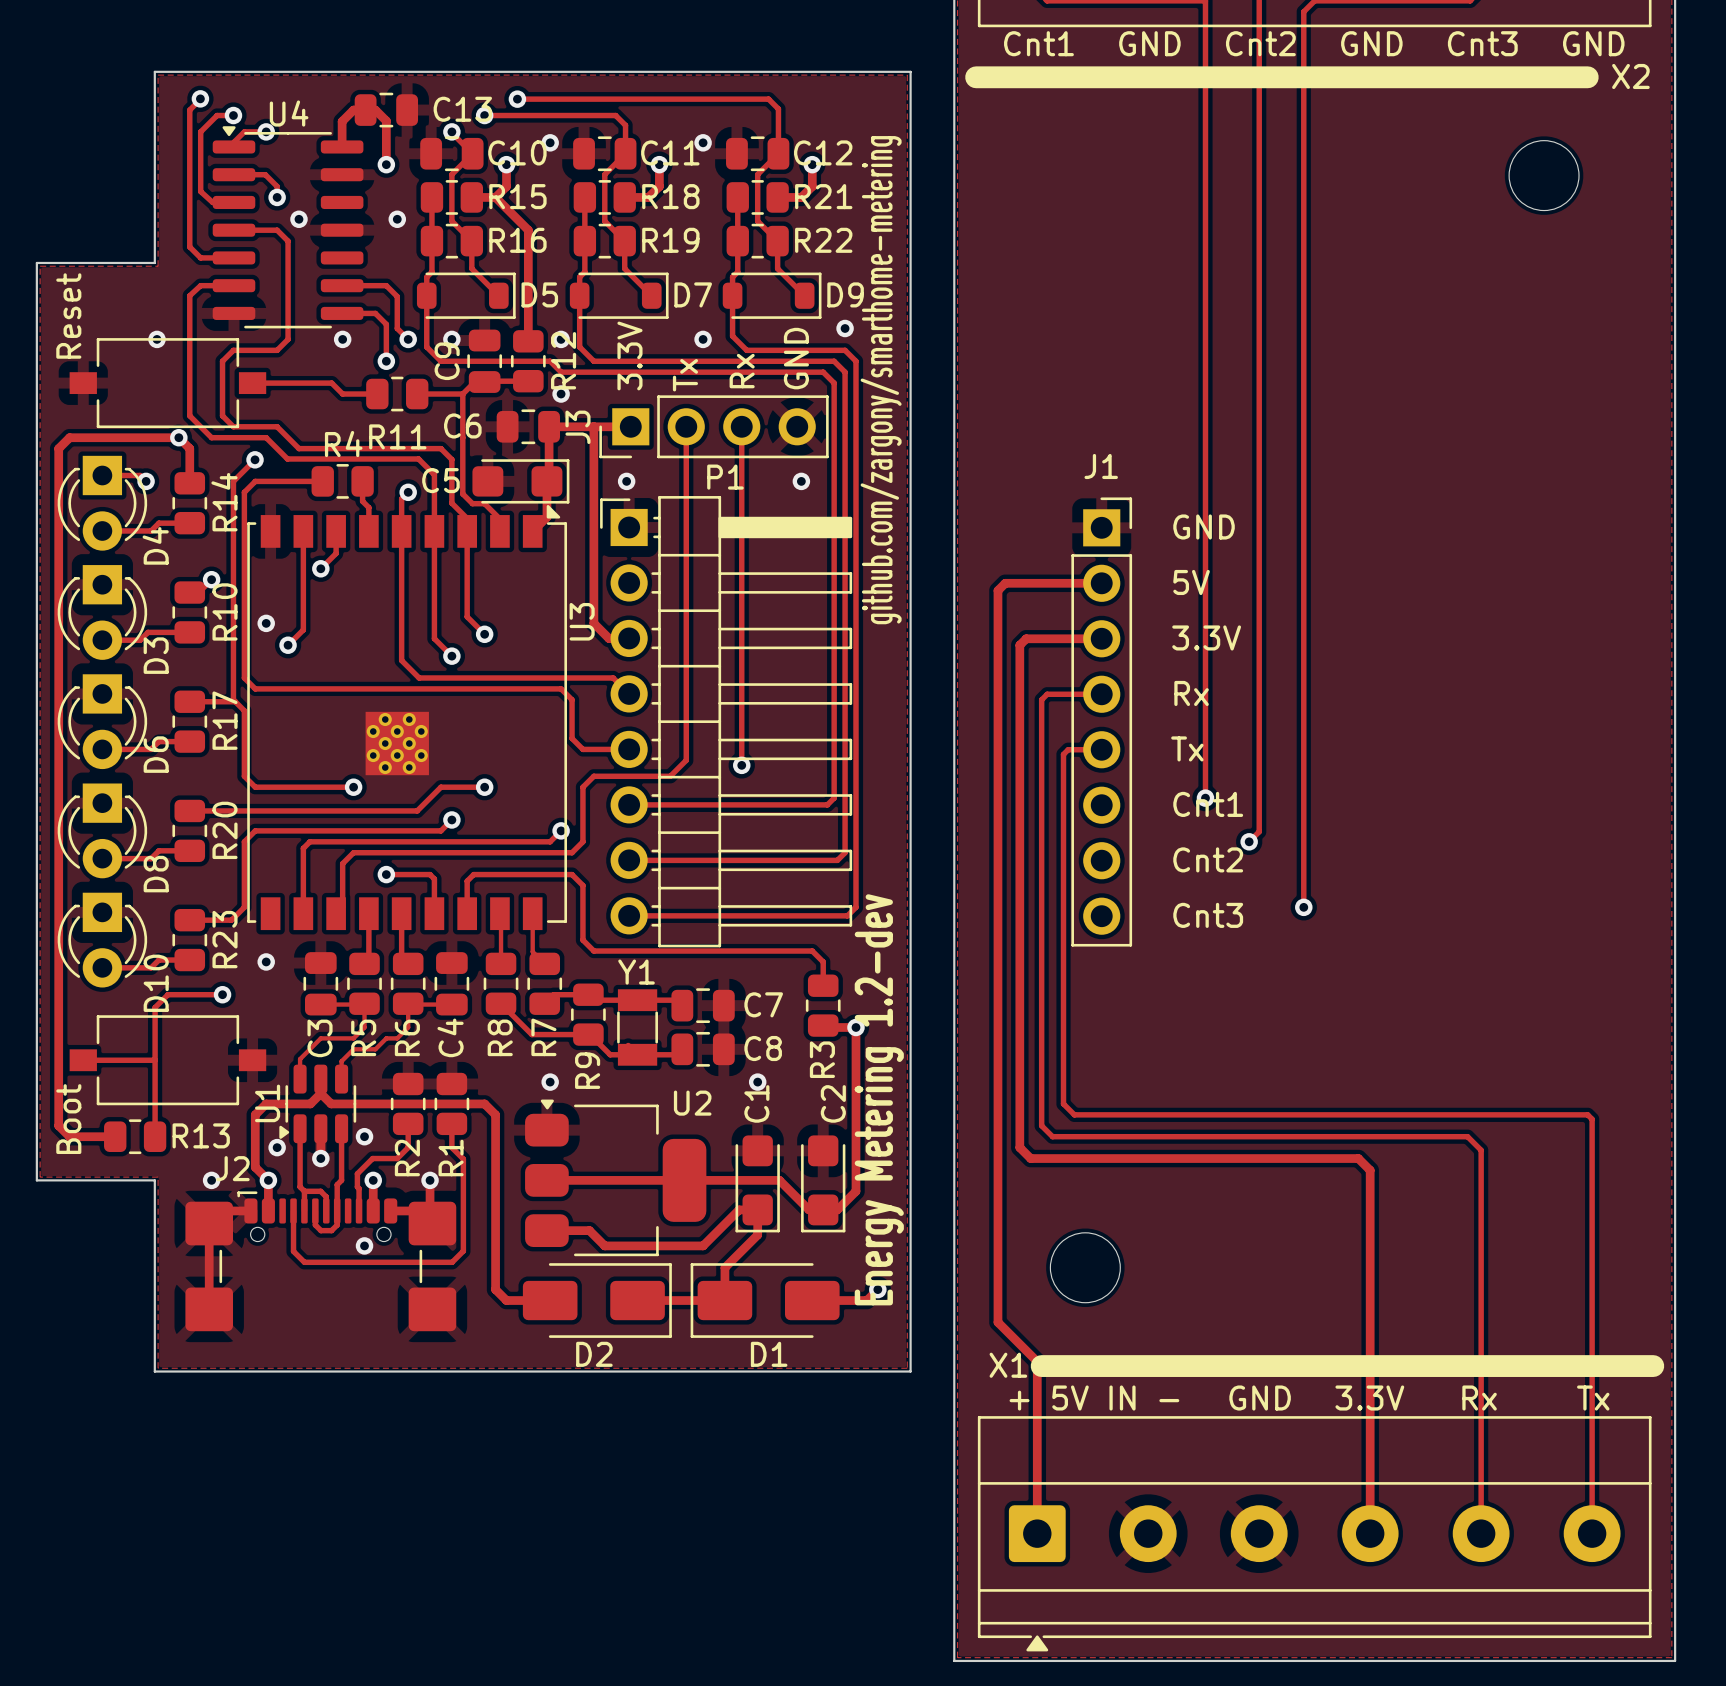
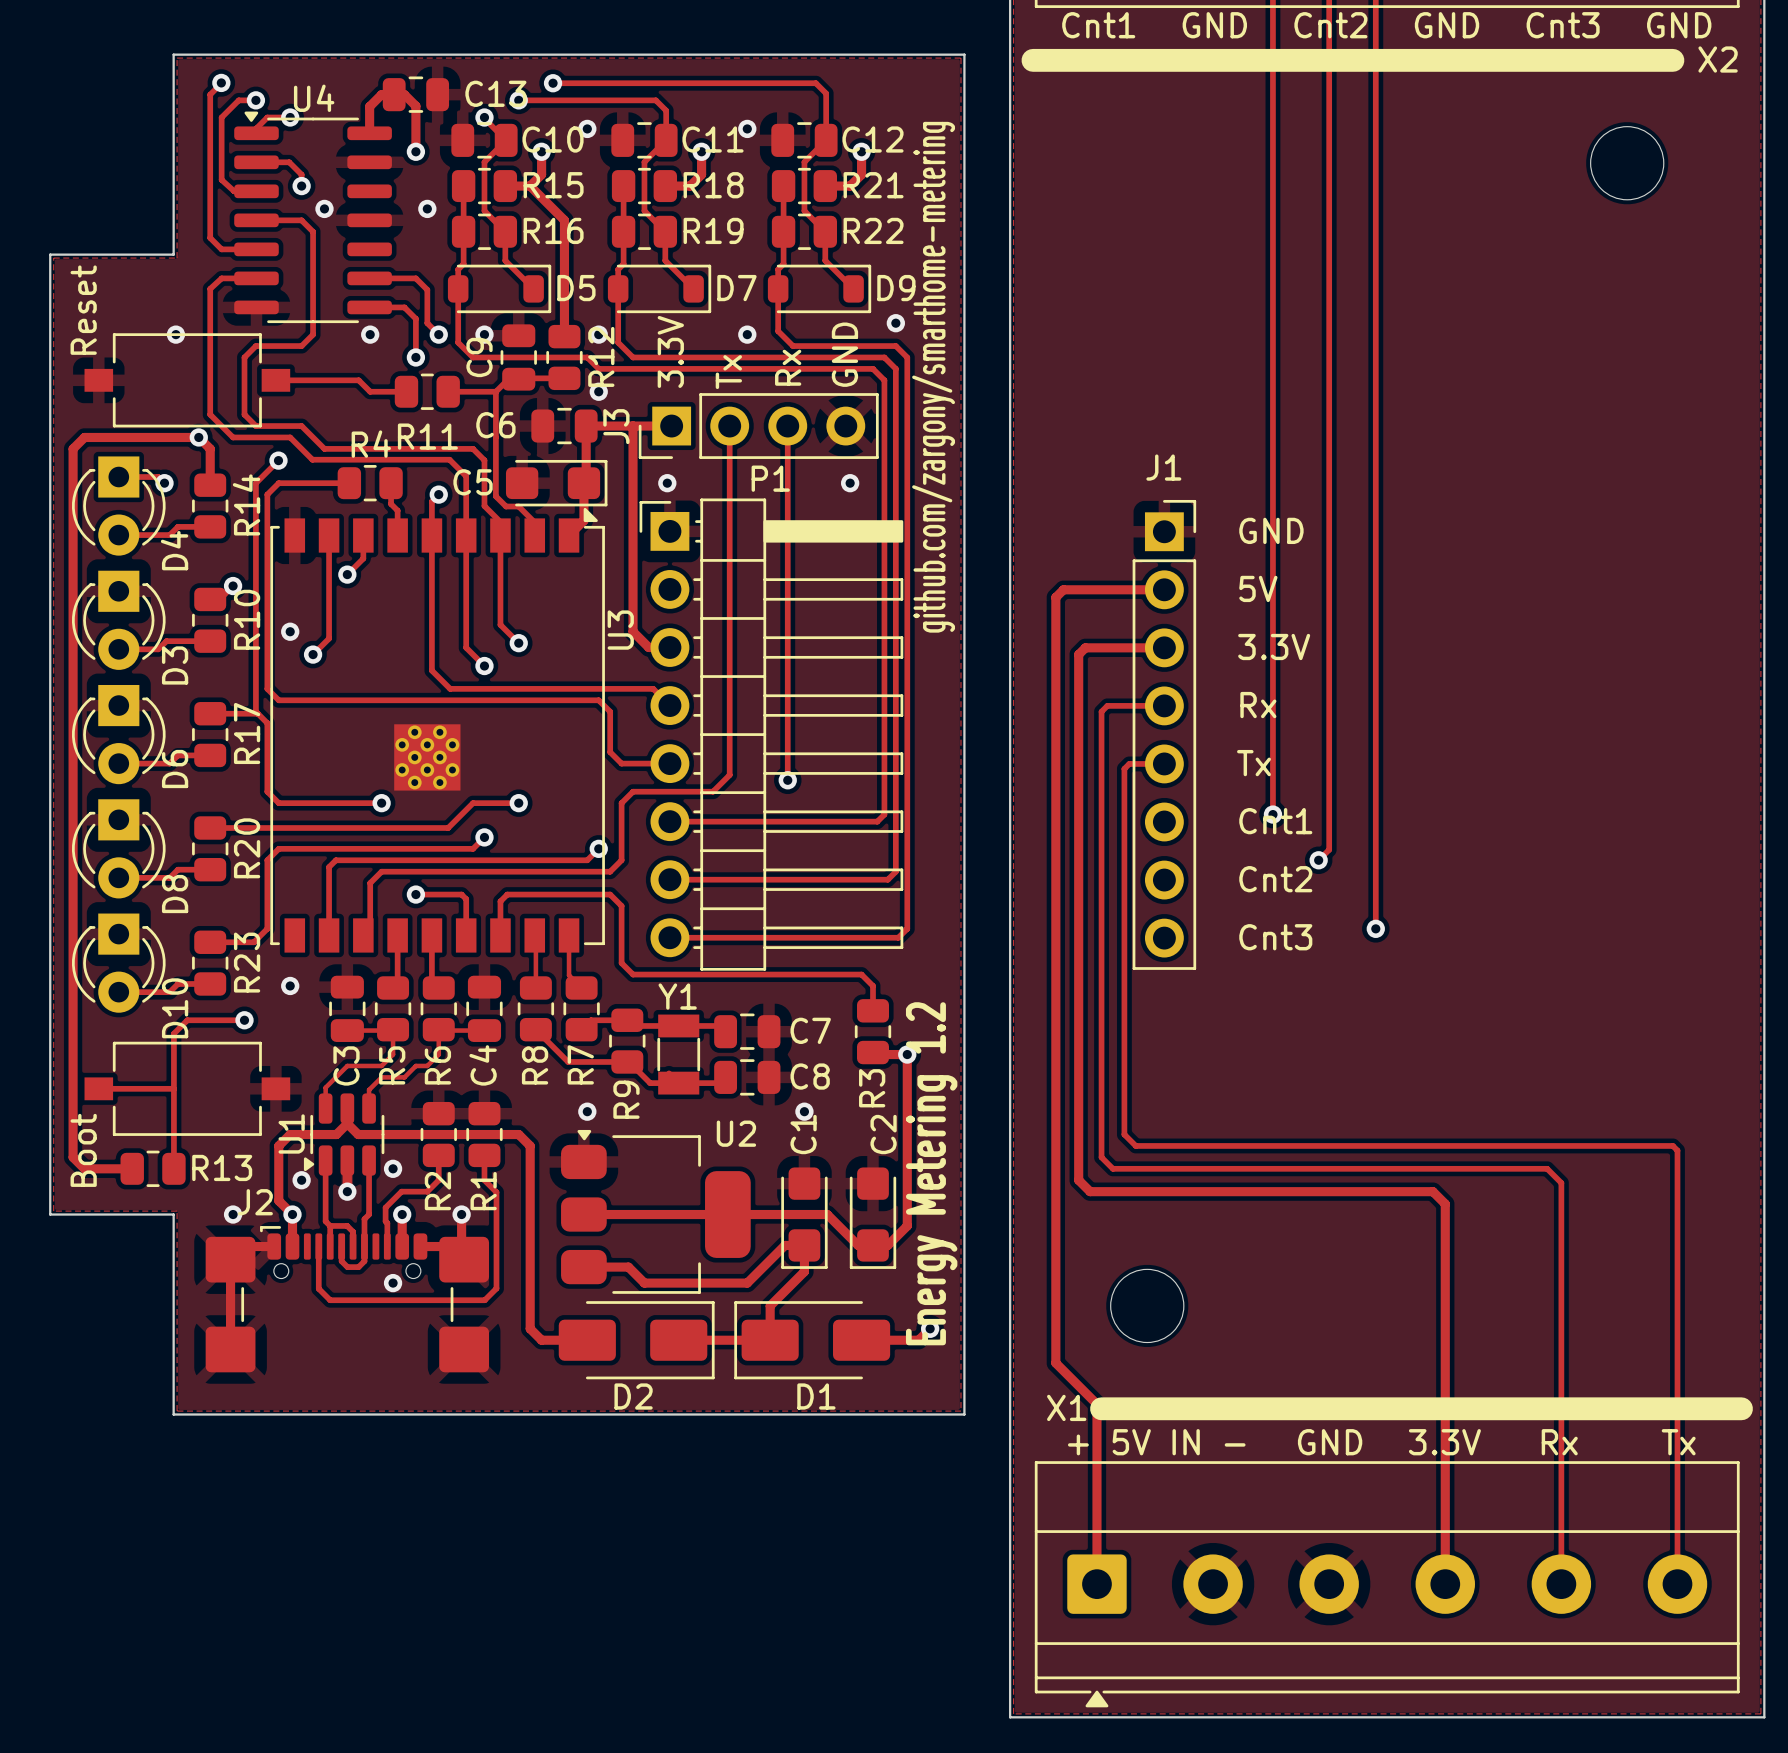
text: Energy Metering 1.2-dev (879, 1099) -> Energy Metering 1.2 (931, 1173)

